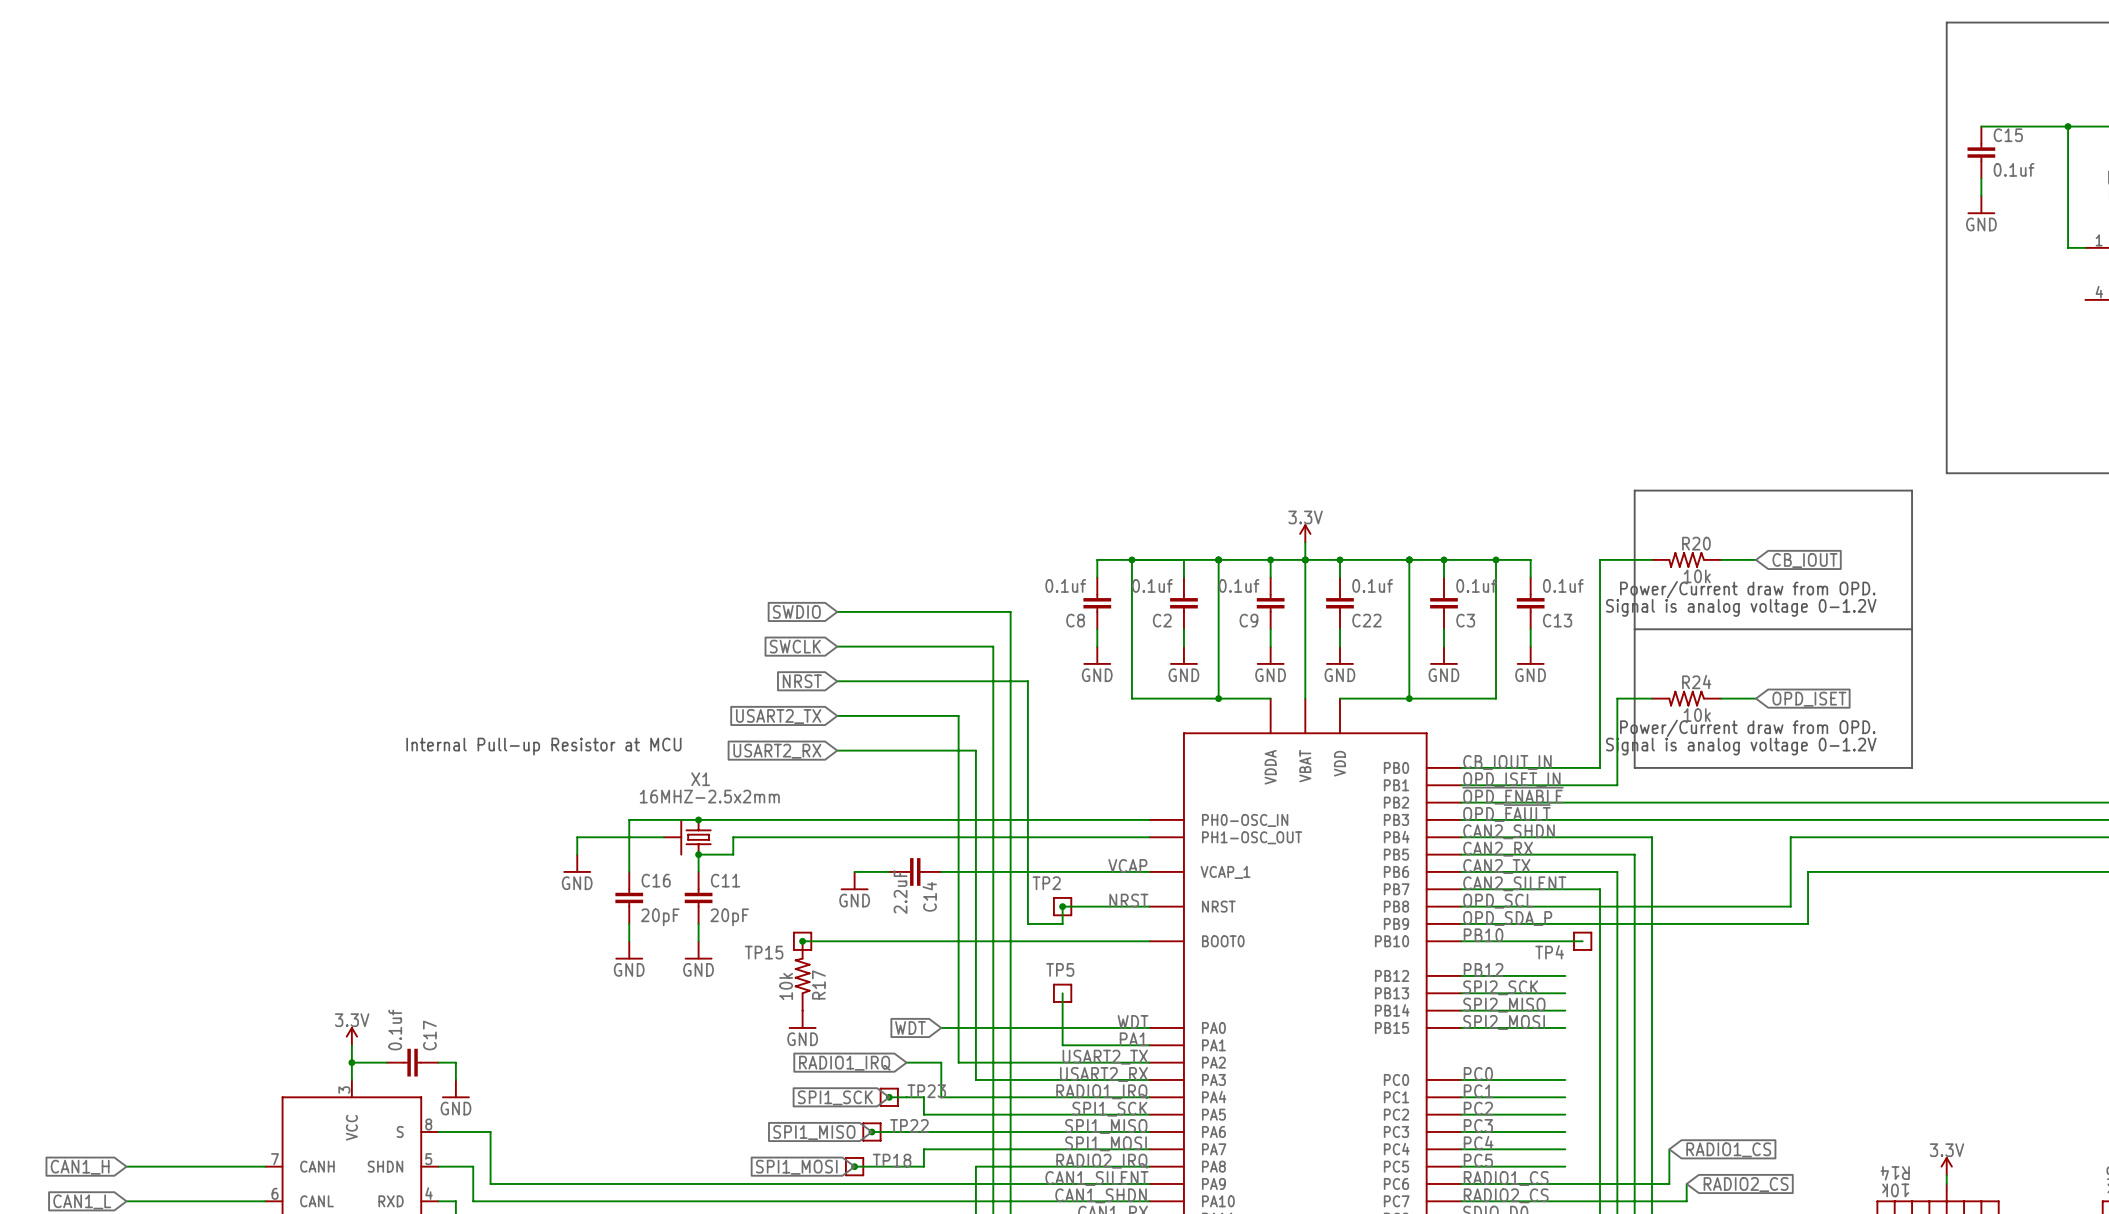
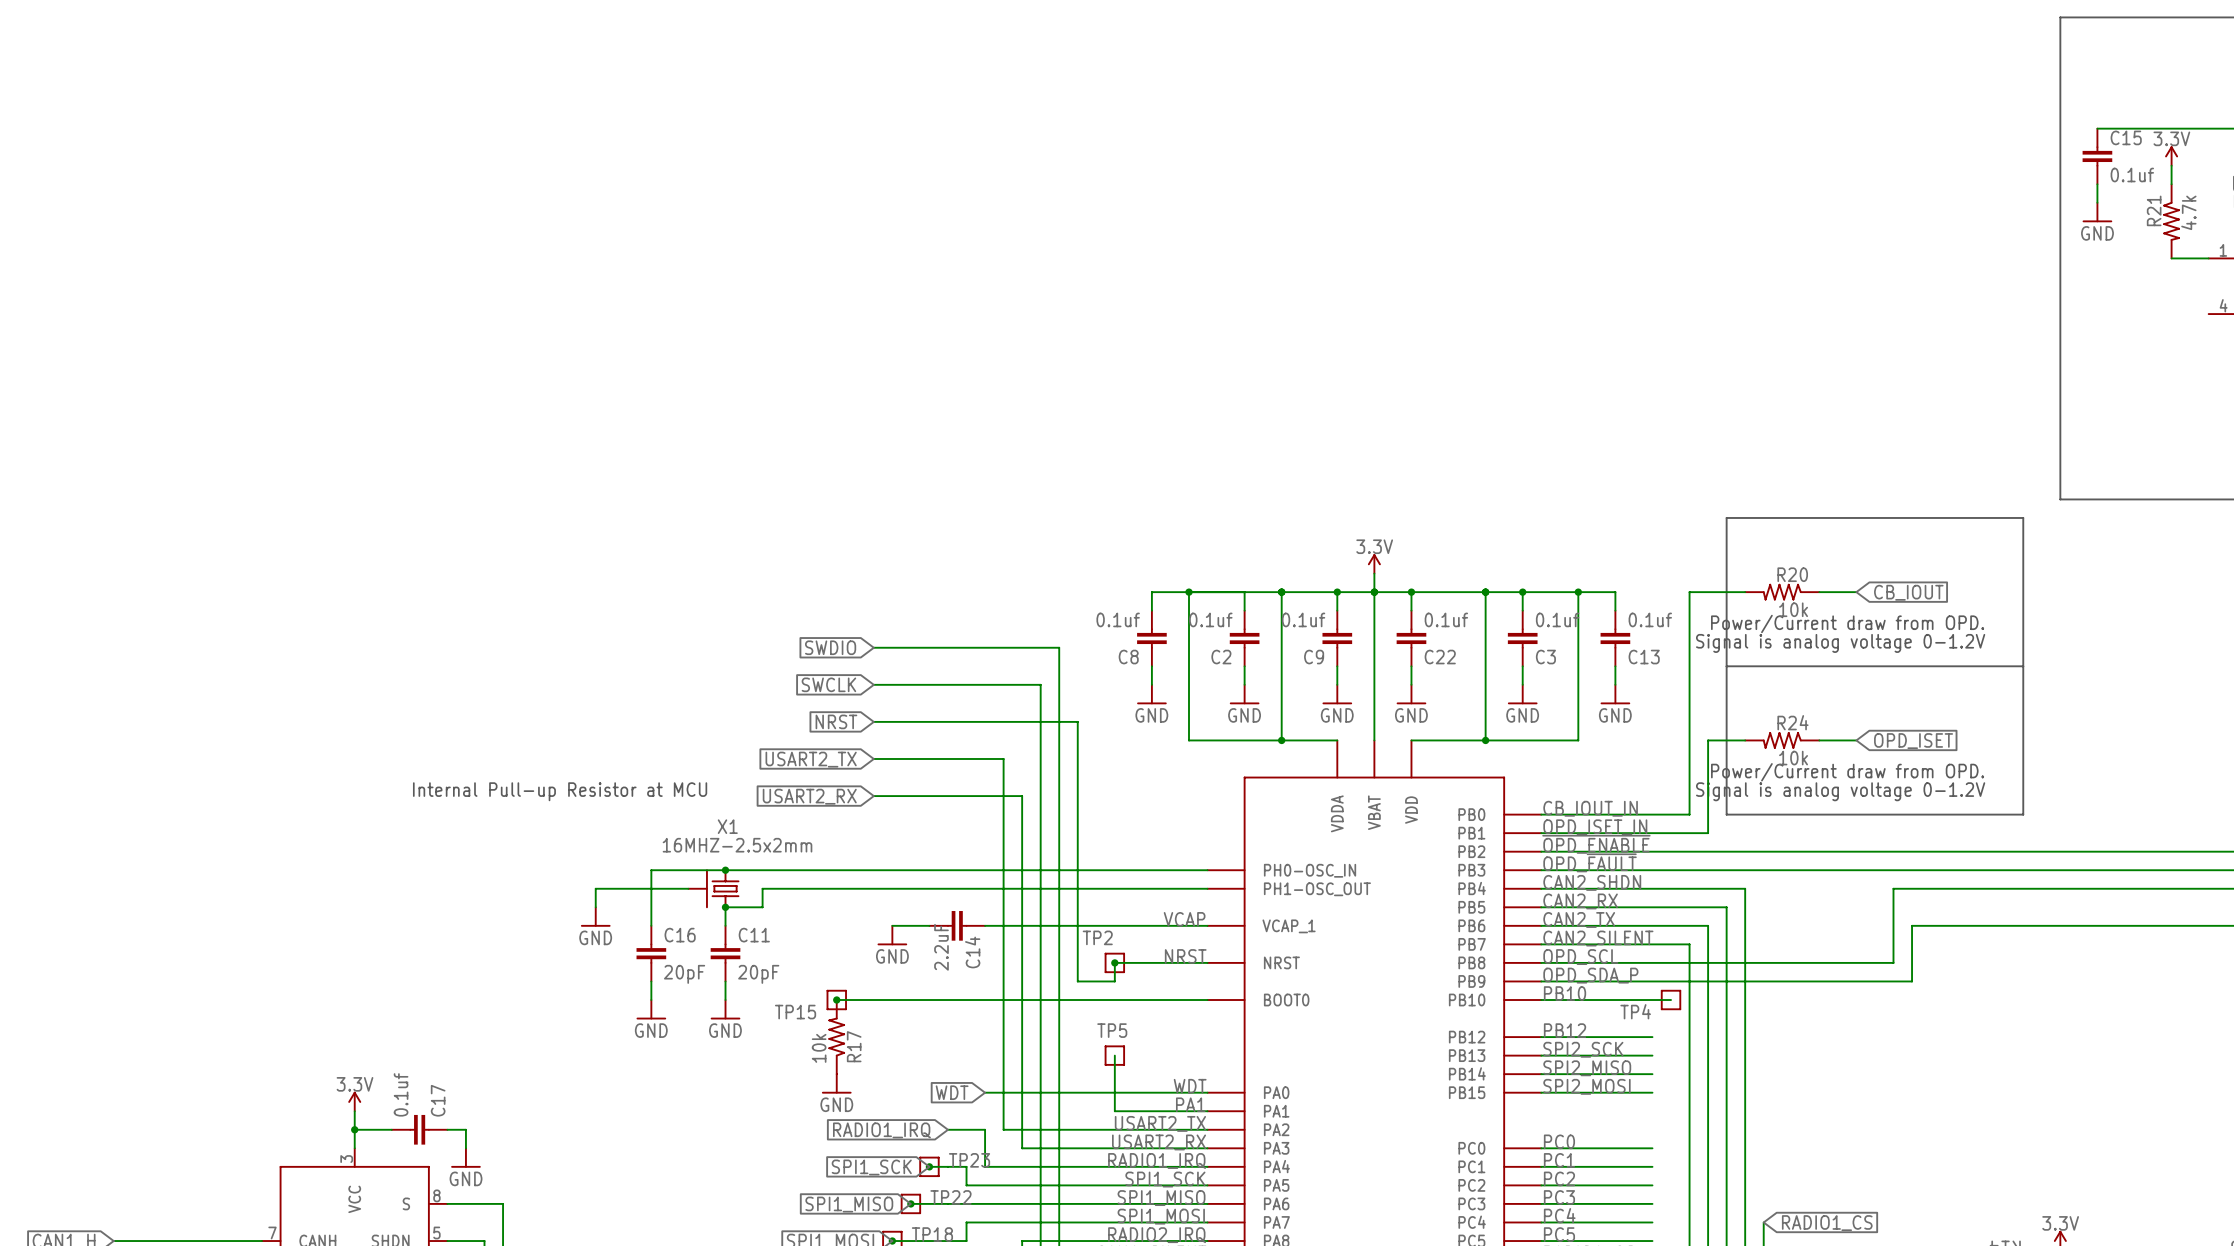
wire: (2068, 126) (2068, 247) -> (2171, 258) (2190, 258)
junction: (2068, 126) -> none
power symbol: none -> 3.3V (2171, 156)
wire: none -> (2171, 165) (2171, 184)
R21: none -> 4.7k (2171, 221)

